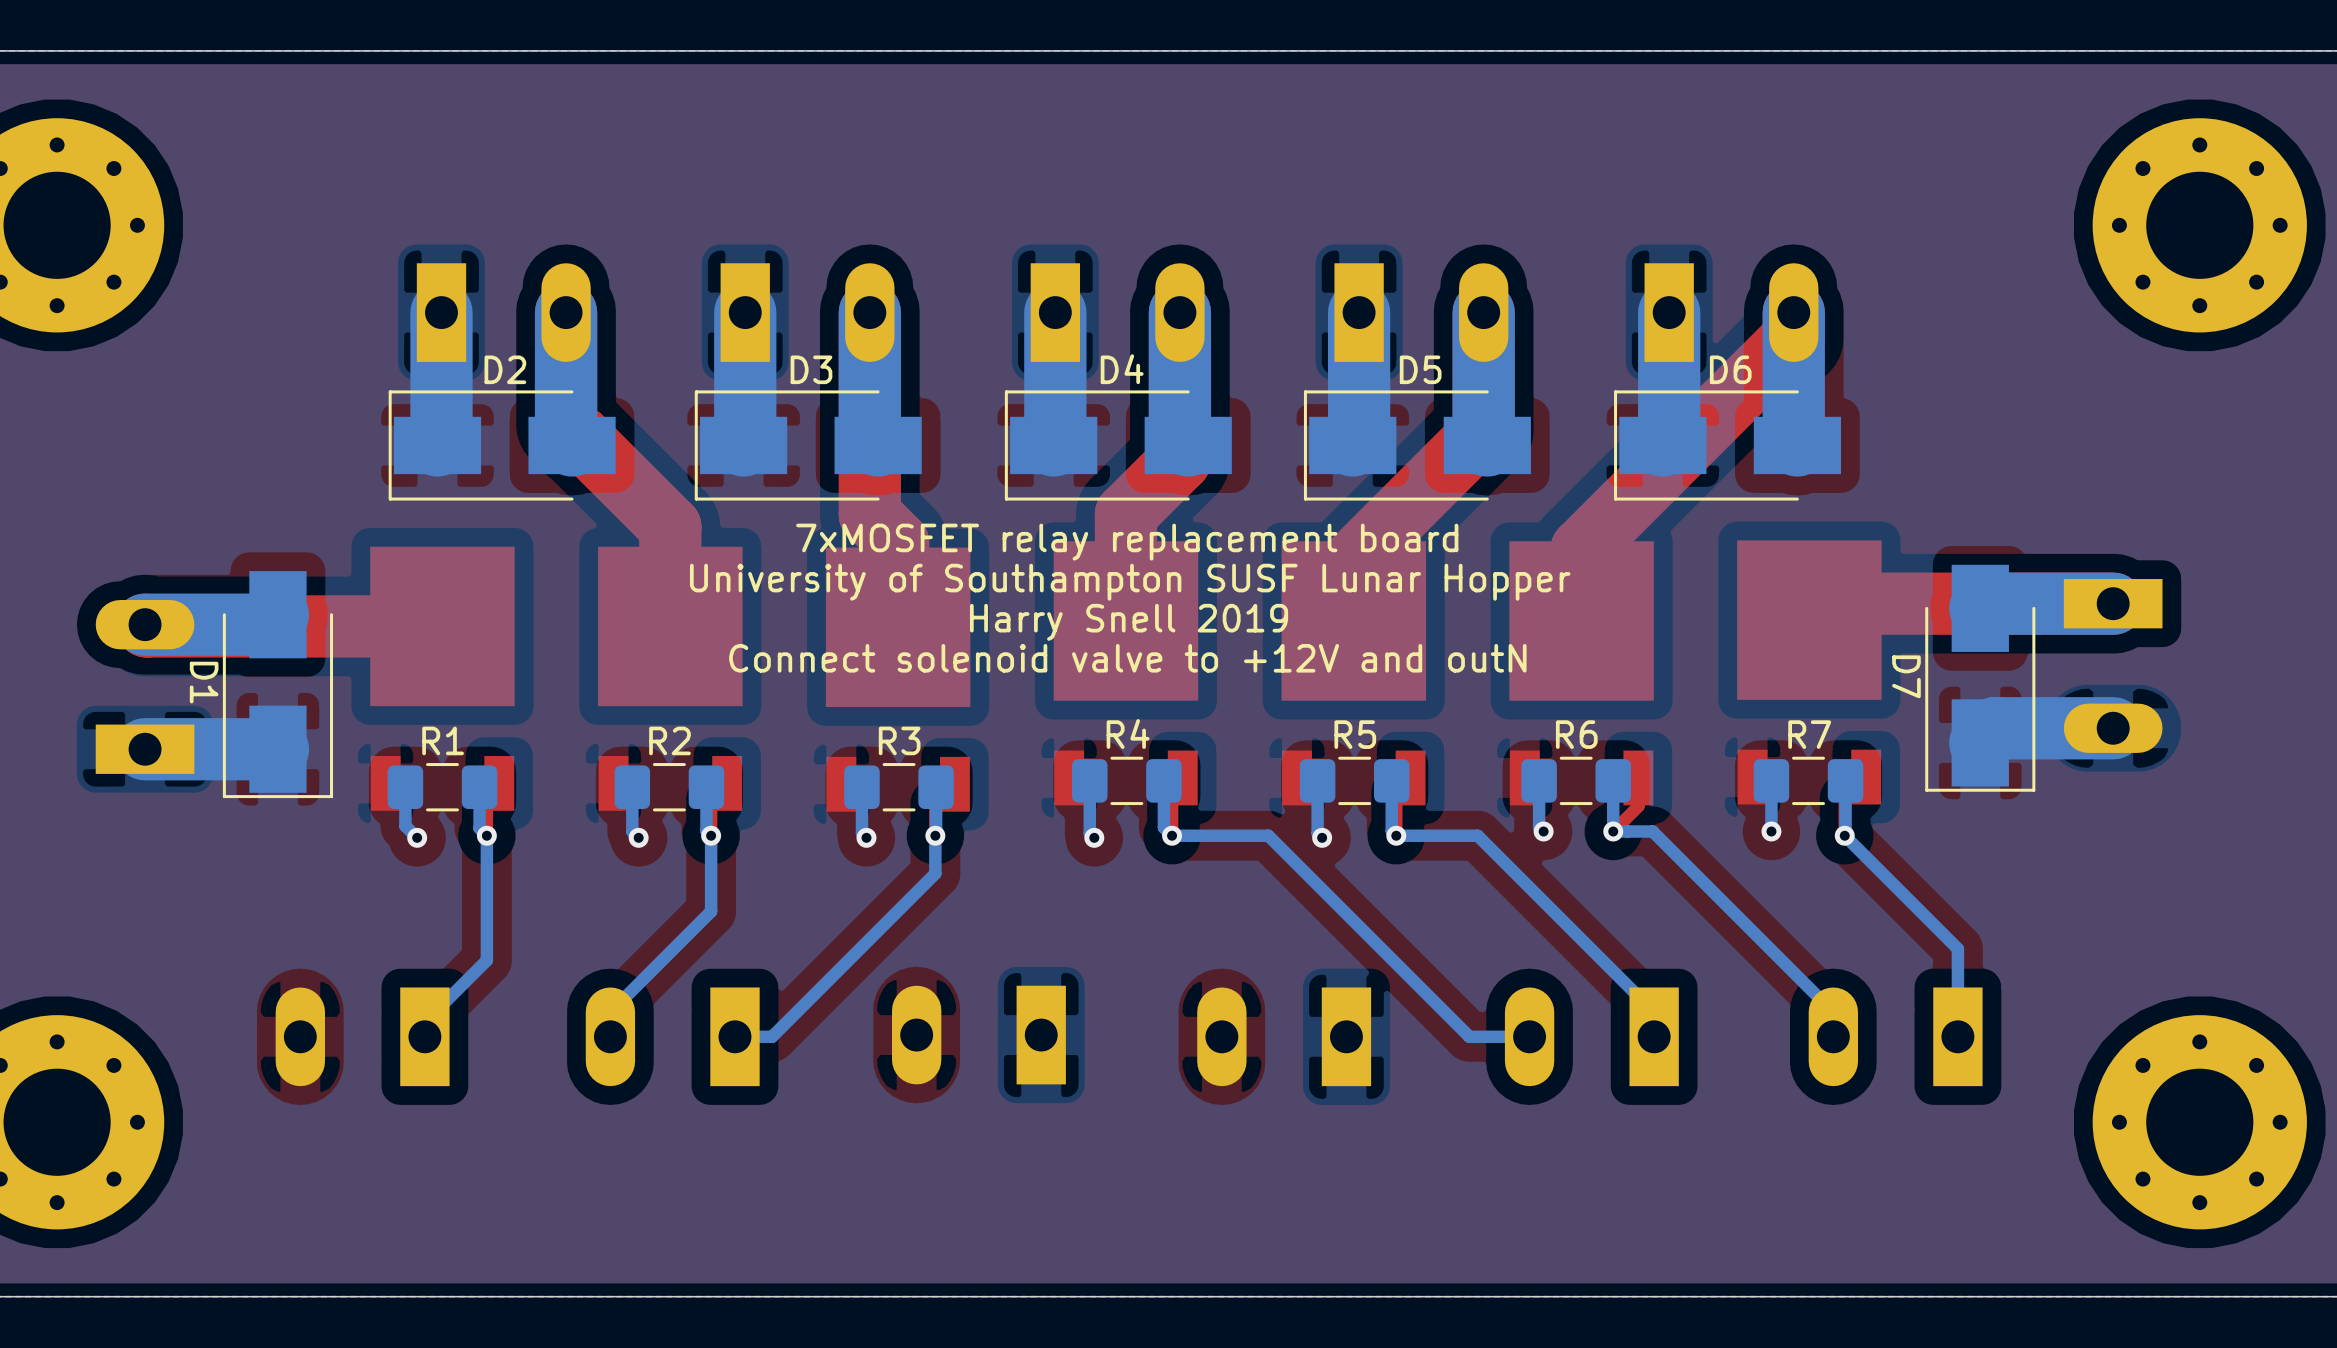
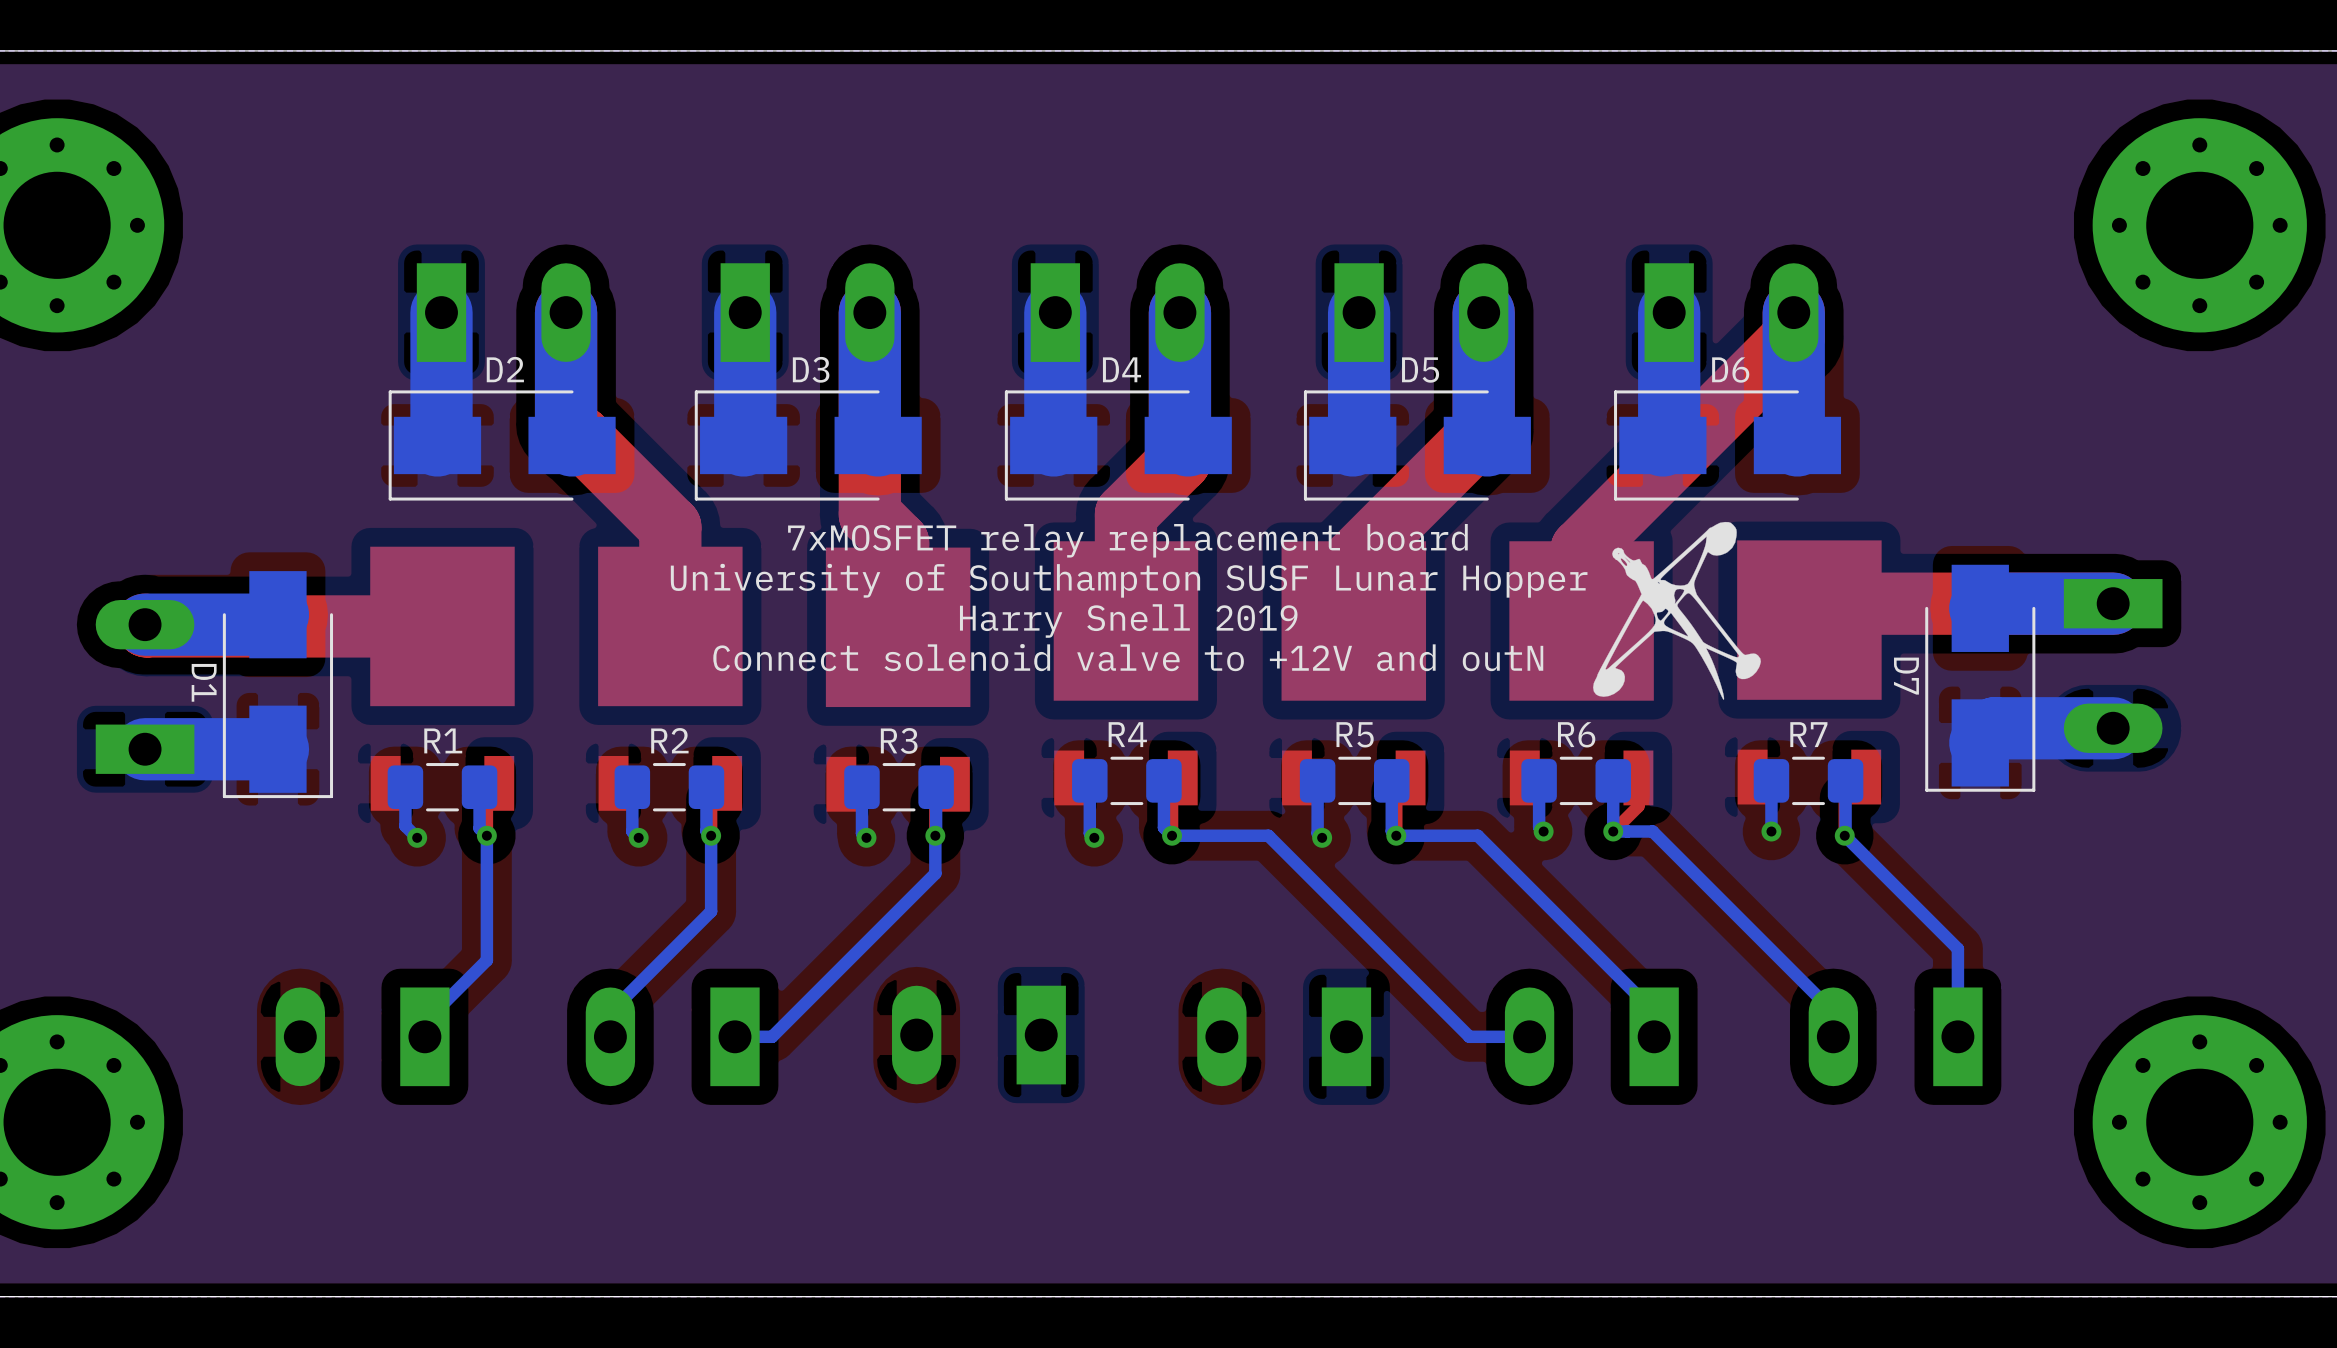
drawing: none -> [1593, 521, 1761, 700]

